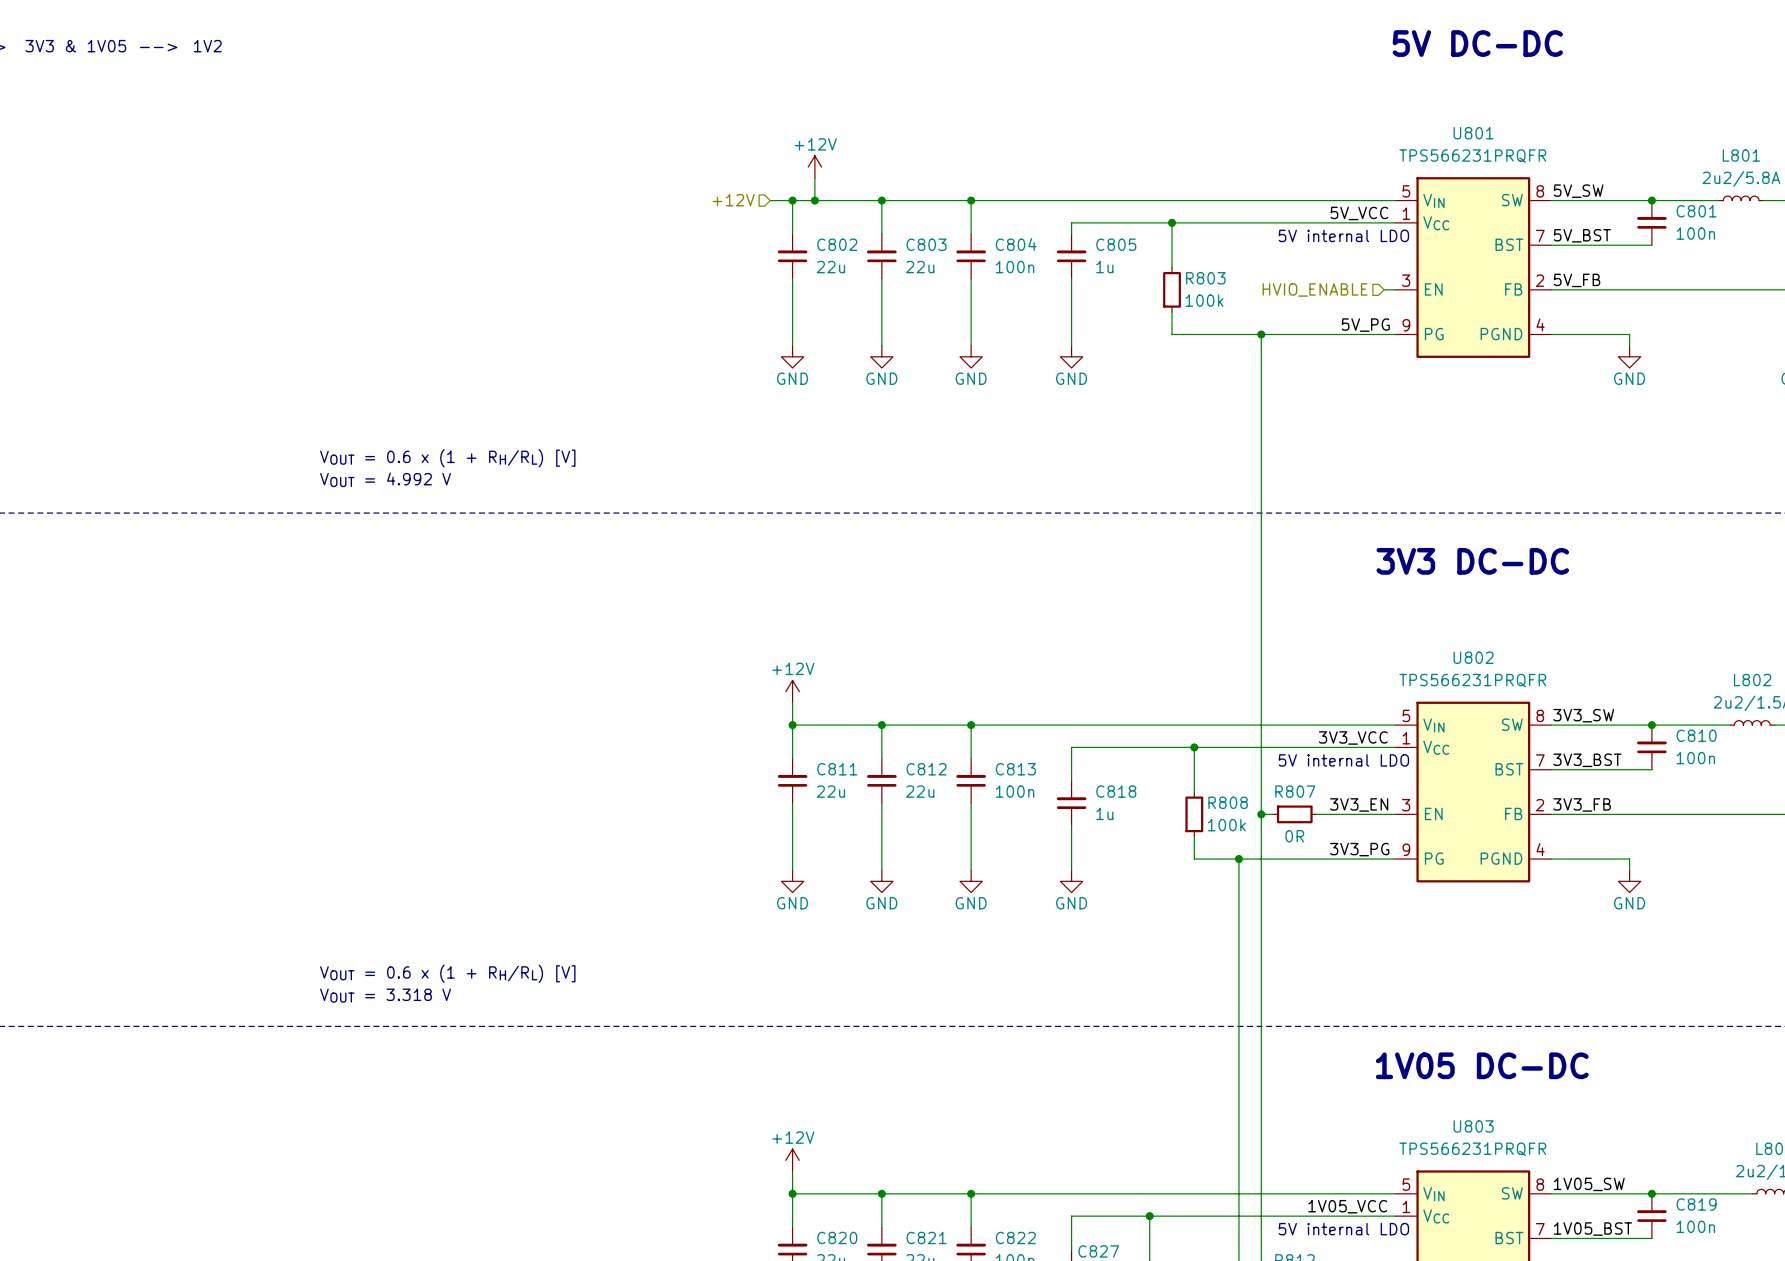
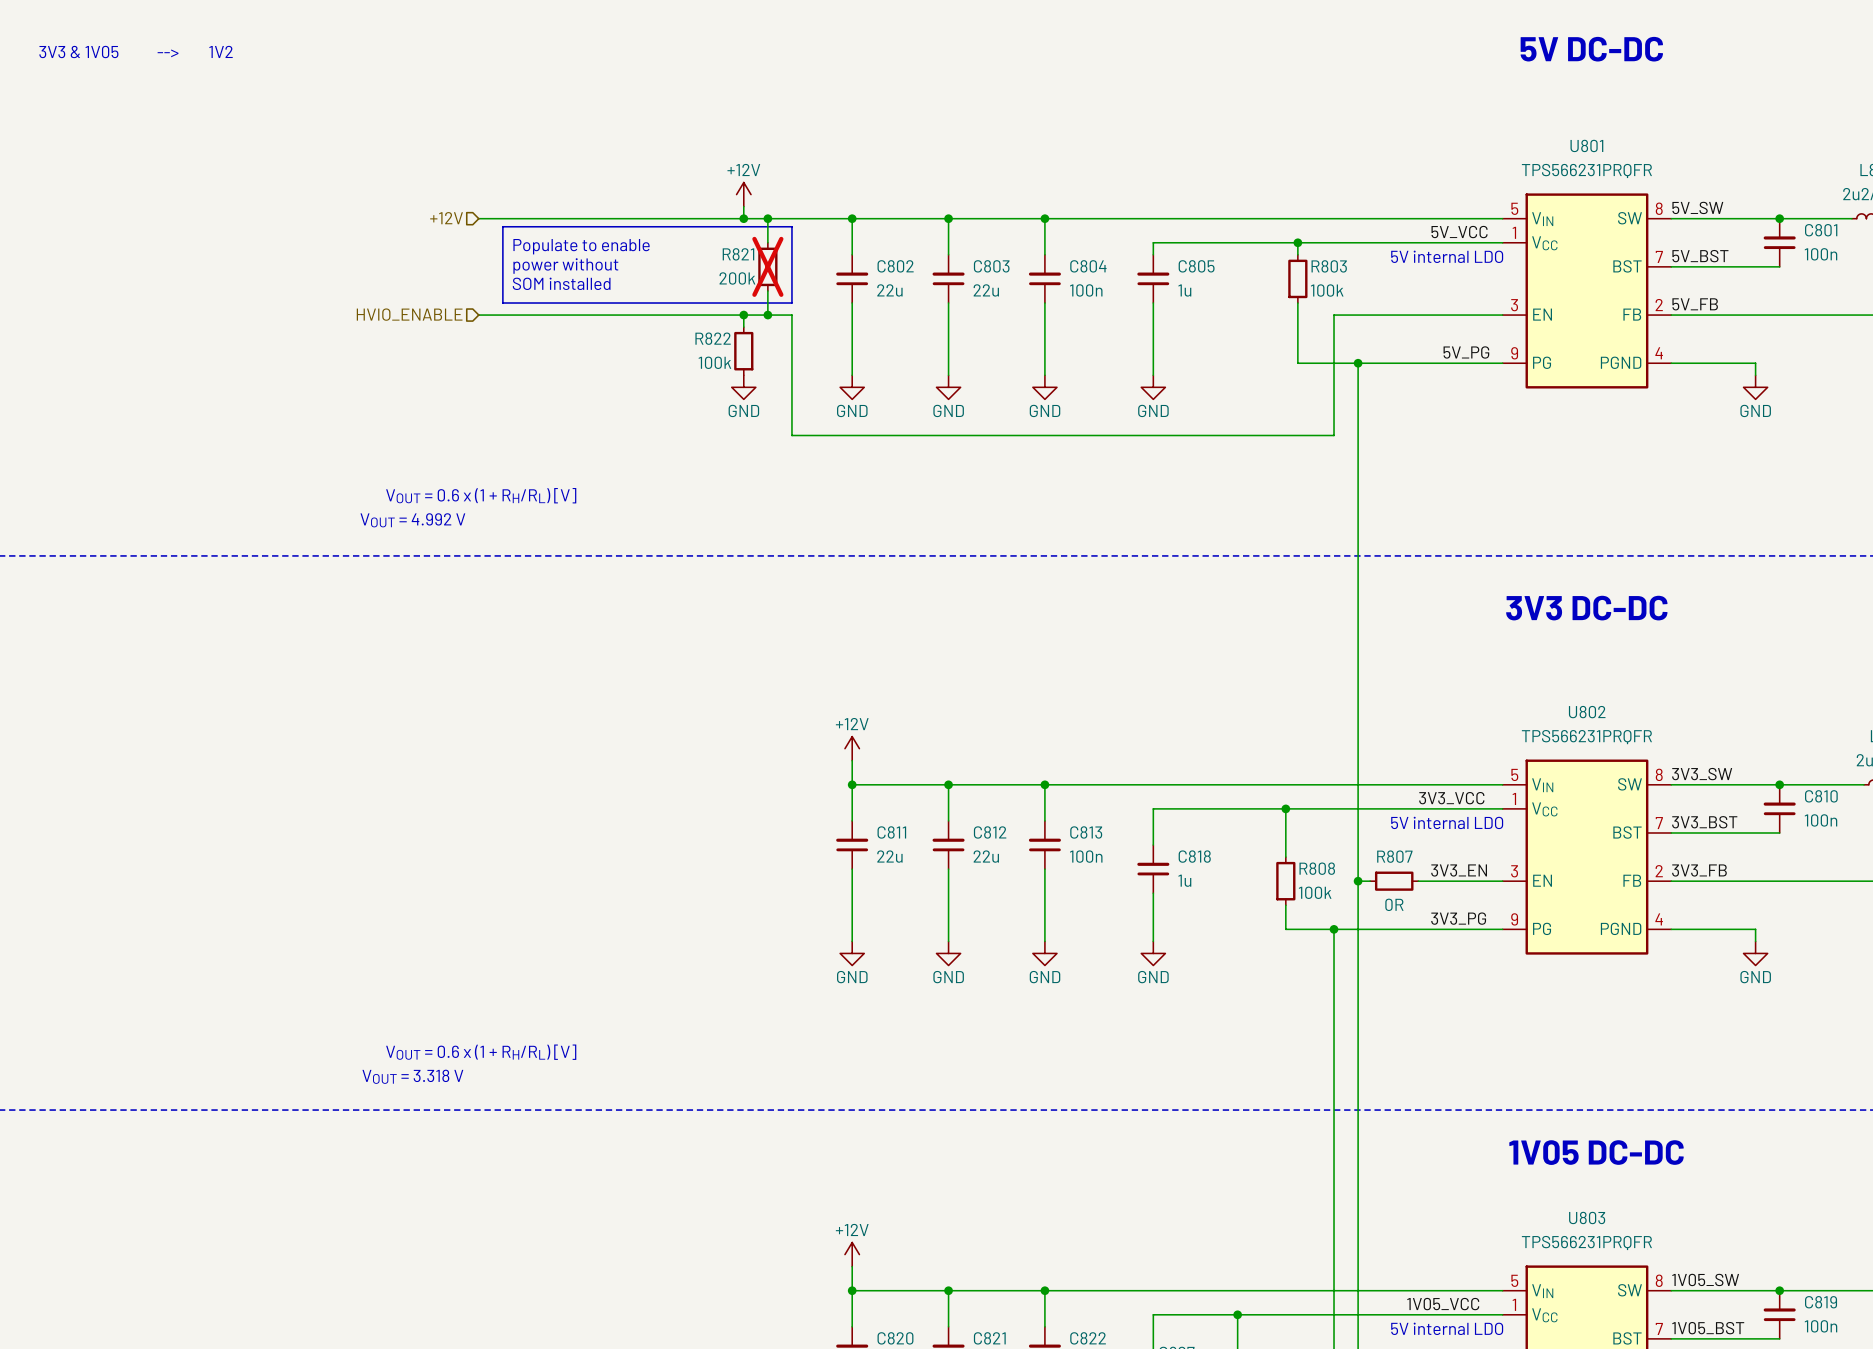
power symbol position: +12V (814, 167) -> +12V (743, 194)
wire: (814, 178) (814, 200) -> (767, 218) (767, 242)
wire: none -> (743, 206) (743, 218)
hierarchical label: none -> +12V (446, 218)
wire: none -> (478, 218) (828, 218)
junction: none -> (743, 218)
junction: none -> (767, 218)
hierarchical label: +12V (733, 200) -> none
junction: (814, 200) -> none
line: none -> (502, 226) (791, 226) (791, 303) (502, 303) (502, 226)
wire: (1172, 222) (1172, 267) -> none
junction position: (1172, 222) -> (1297, 242)
wire: none -> (1297, 242) (1297, 254)
text: none -> Populate to enable (581, 246)
text: none -> power without (565, 266)
R821: none -> (767, 266)
text: none -> SOM installed (561, 283)
wire: none -> (767, 290) (767, 315)
hierarchical label: none -> HVIO_ENABLE (409, 314)
wire: none -> (478, 315) (791, 315) (791, 435) (1334, 435) (1334, 315) (1490, 315)
wire: none -> (743, 315) (743, 327)
junction: none -> (743, 315)
junction: none -> (767, 315)
R803 position: (1172, 289) -> (1297, 278)
hierarchical label: HVIO_ENABLE (1315, 289) -> none
wire: (1172, 312) (1172, 334) (1205, 334) -> (1297, 303) (1297, 363)
R822: none -> (743, 351)
power symbol: none -> GND (743, 387)

